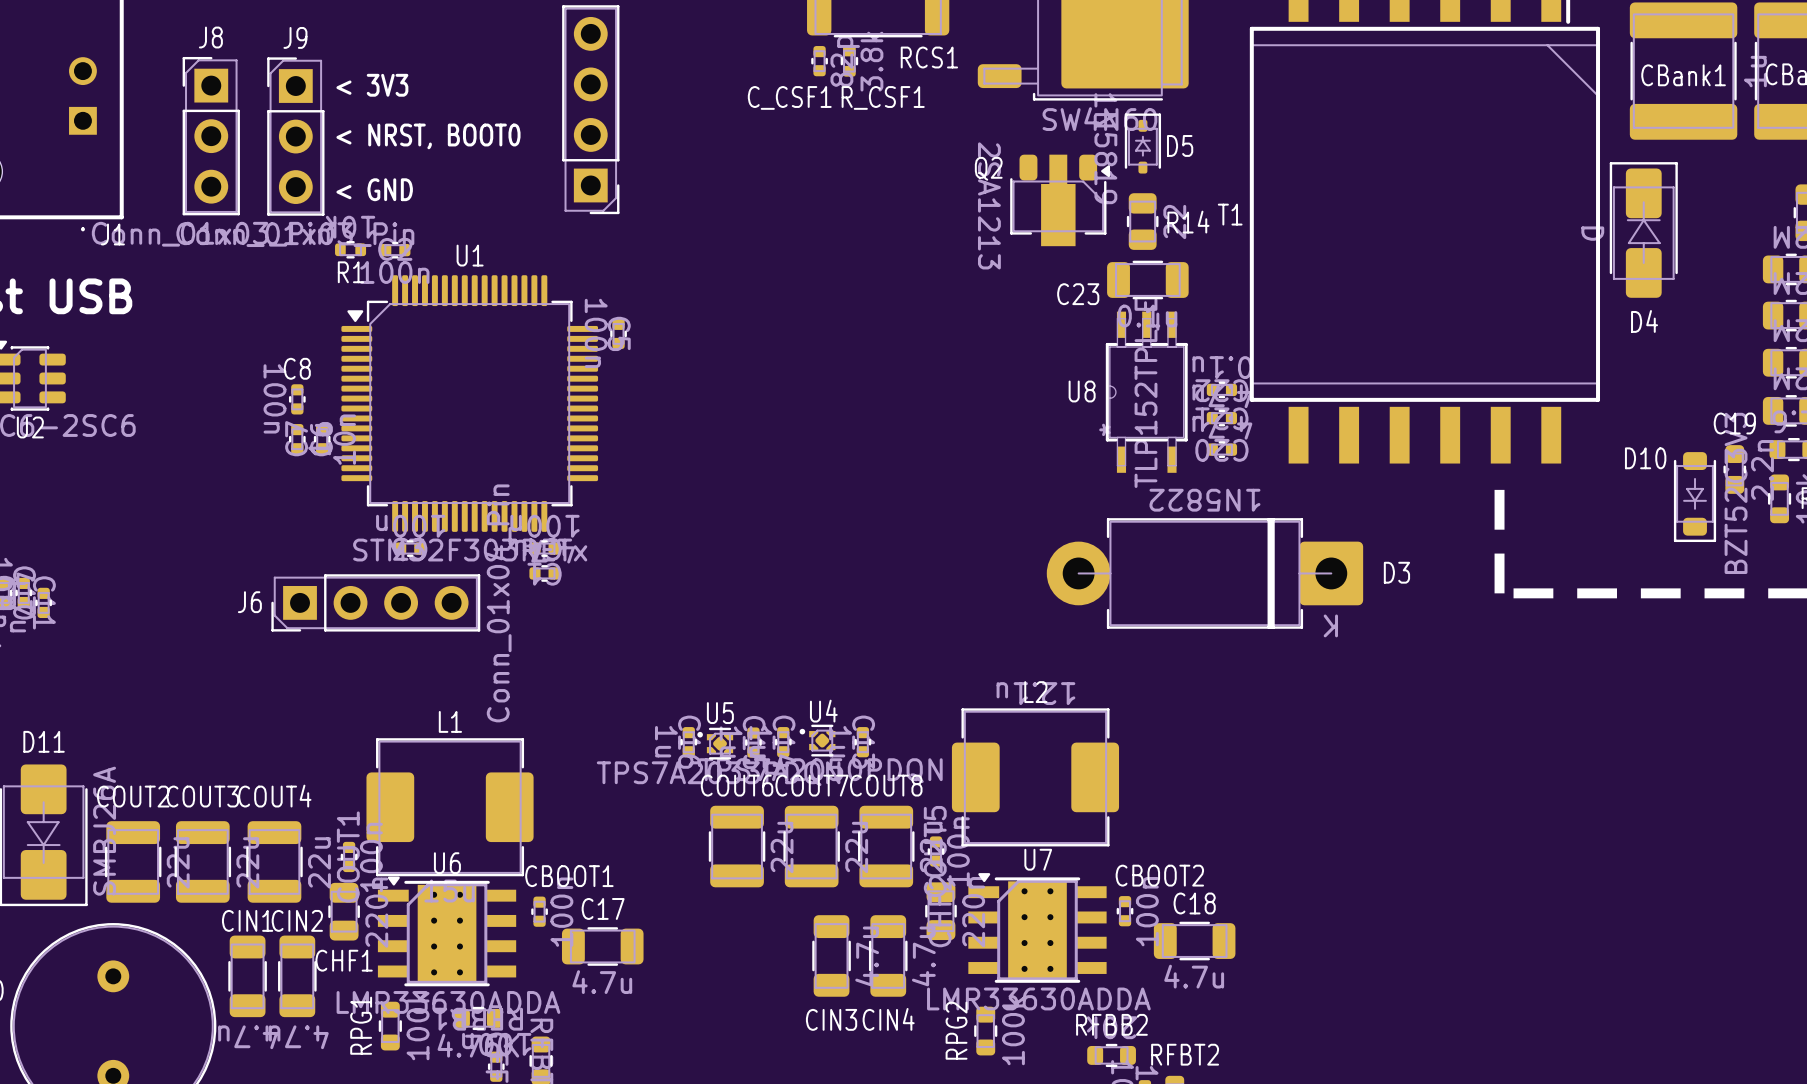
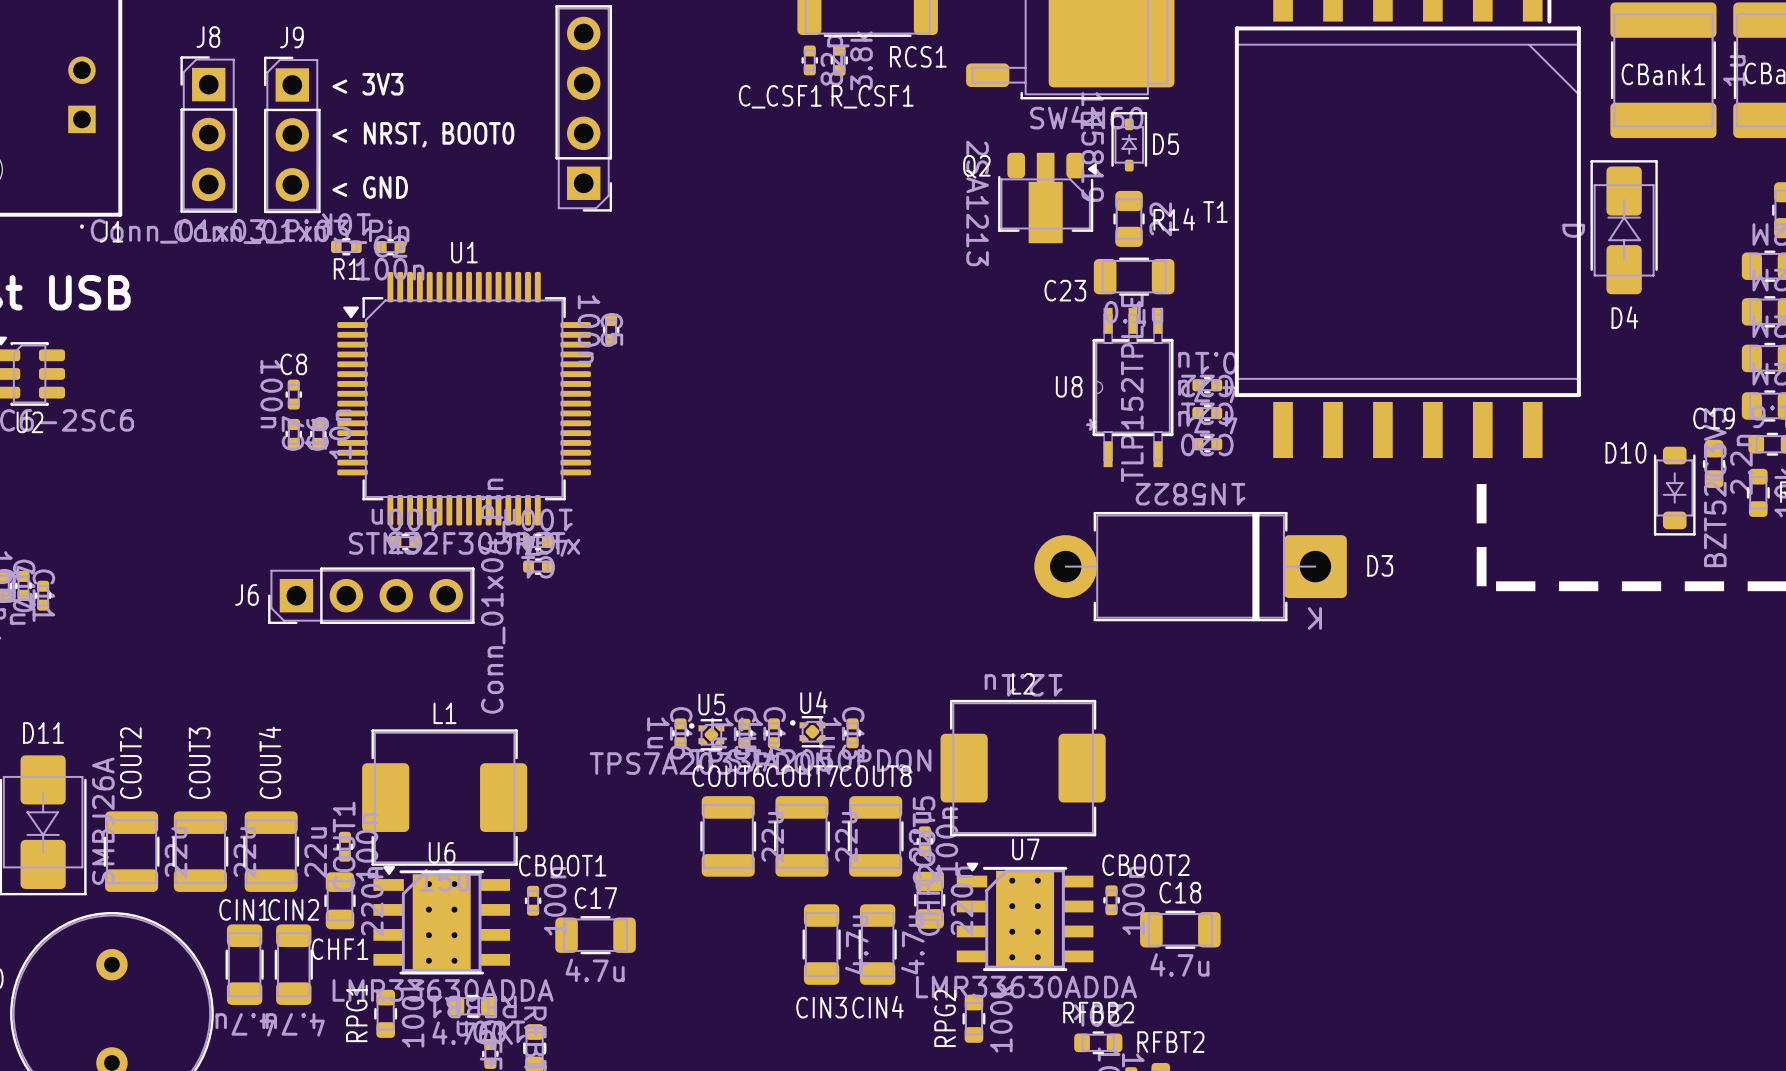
COUT2 name rotation: 0° (133, 796) -> 90° counterclockwise (130, 763)
COUT3 name rotation: 0° (202, 796) -> 90° counterclockwise (199, 763)
COUT4 name rotation: 0° (274, 796) -> 90° counterclockwise (269, 762)

